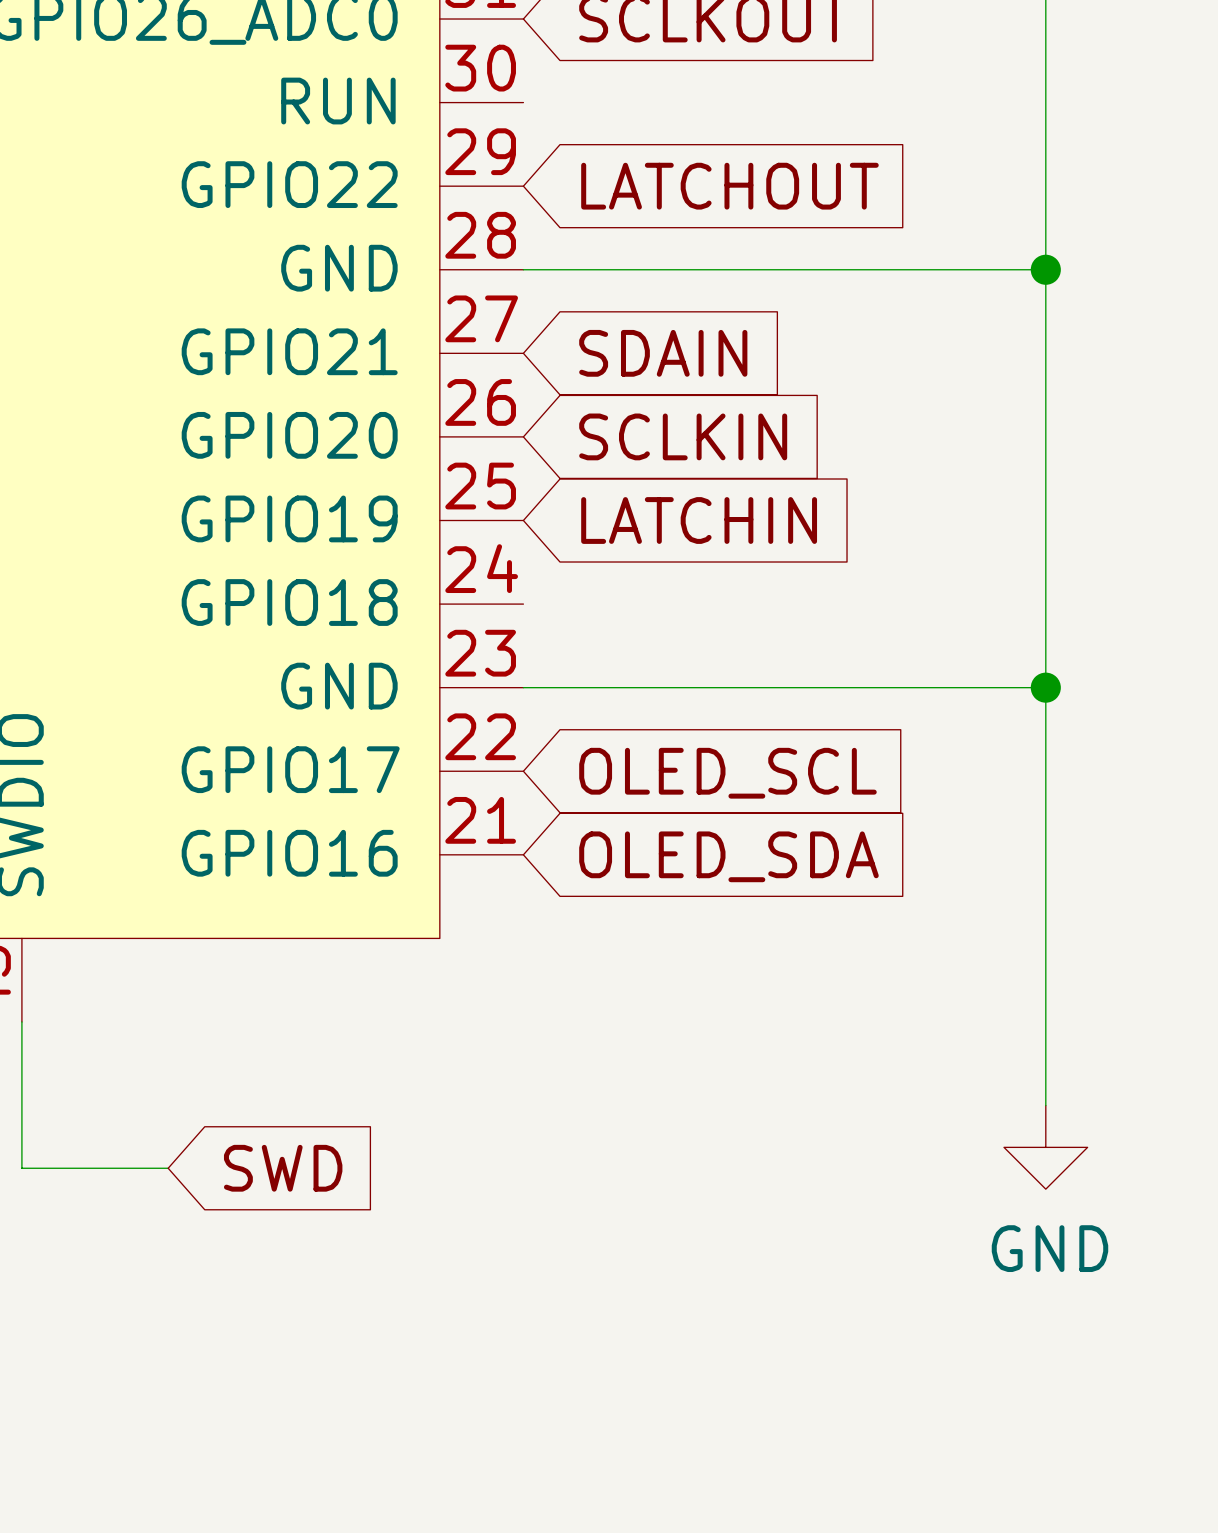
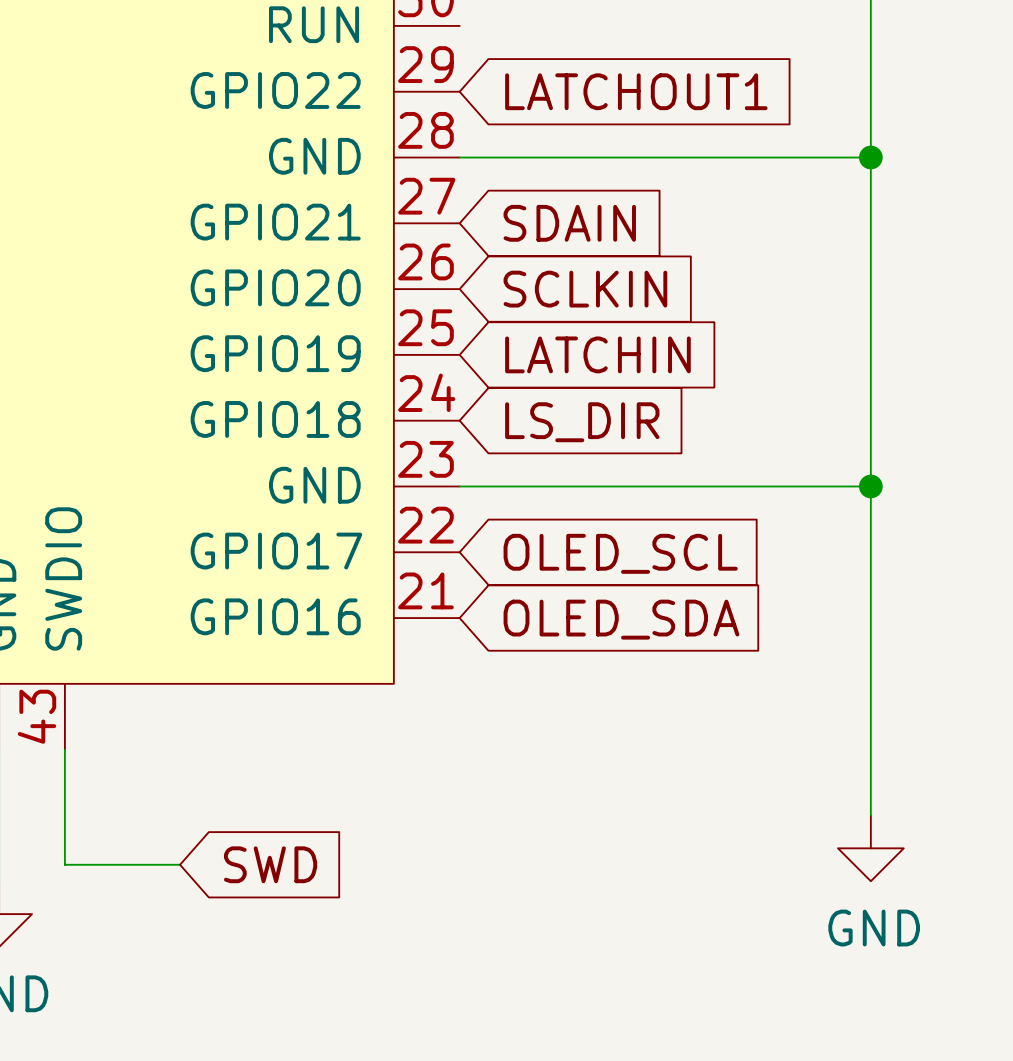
global label: LATCHOUT (729, 186) -> LATCHOUT1 (636, 91)
global label: none -> LS_DIR (582, 422)

